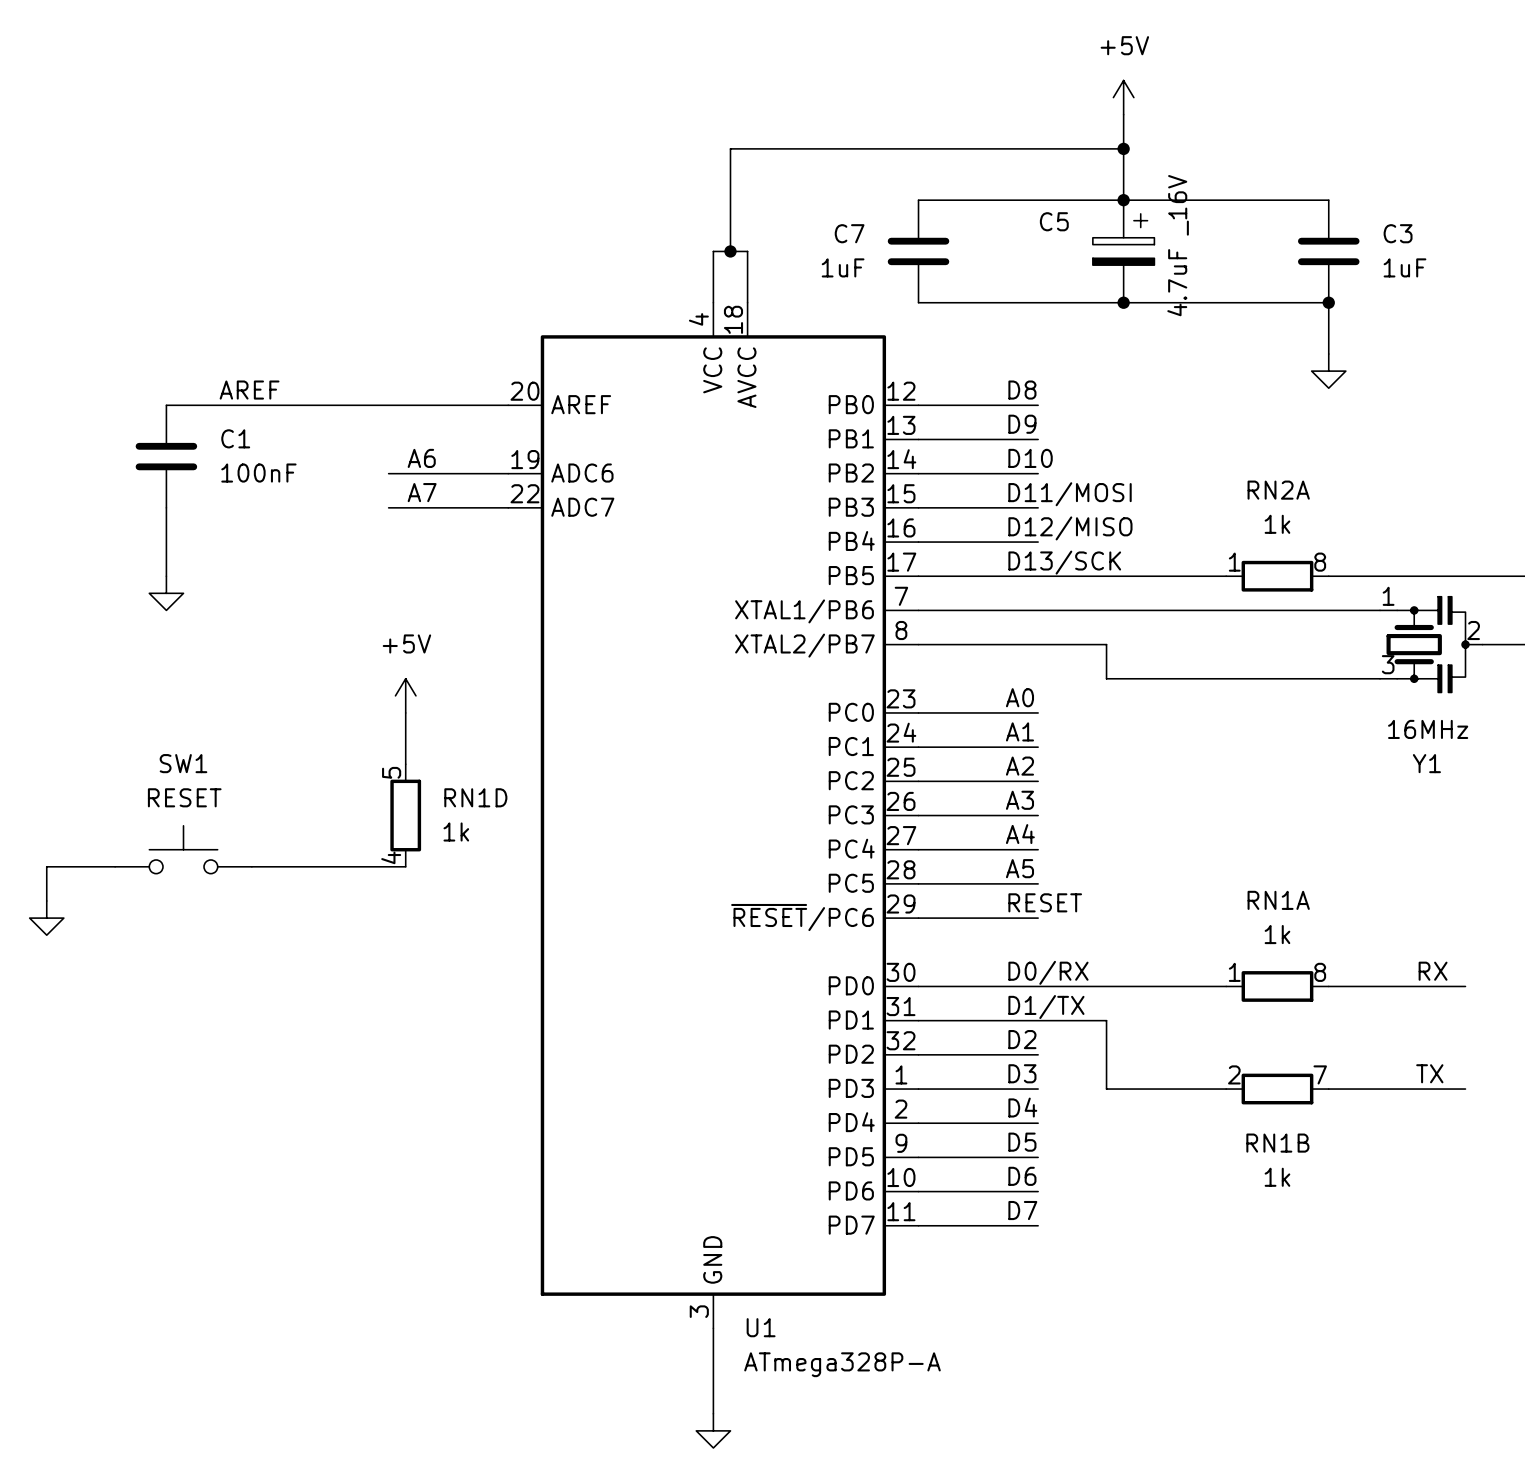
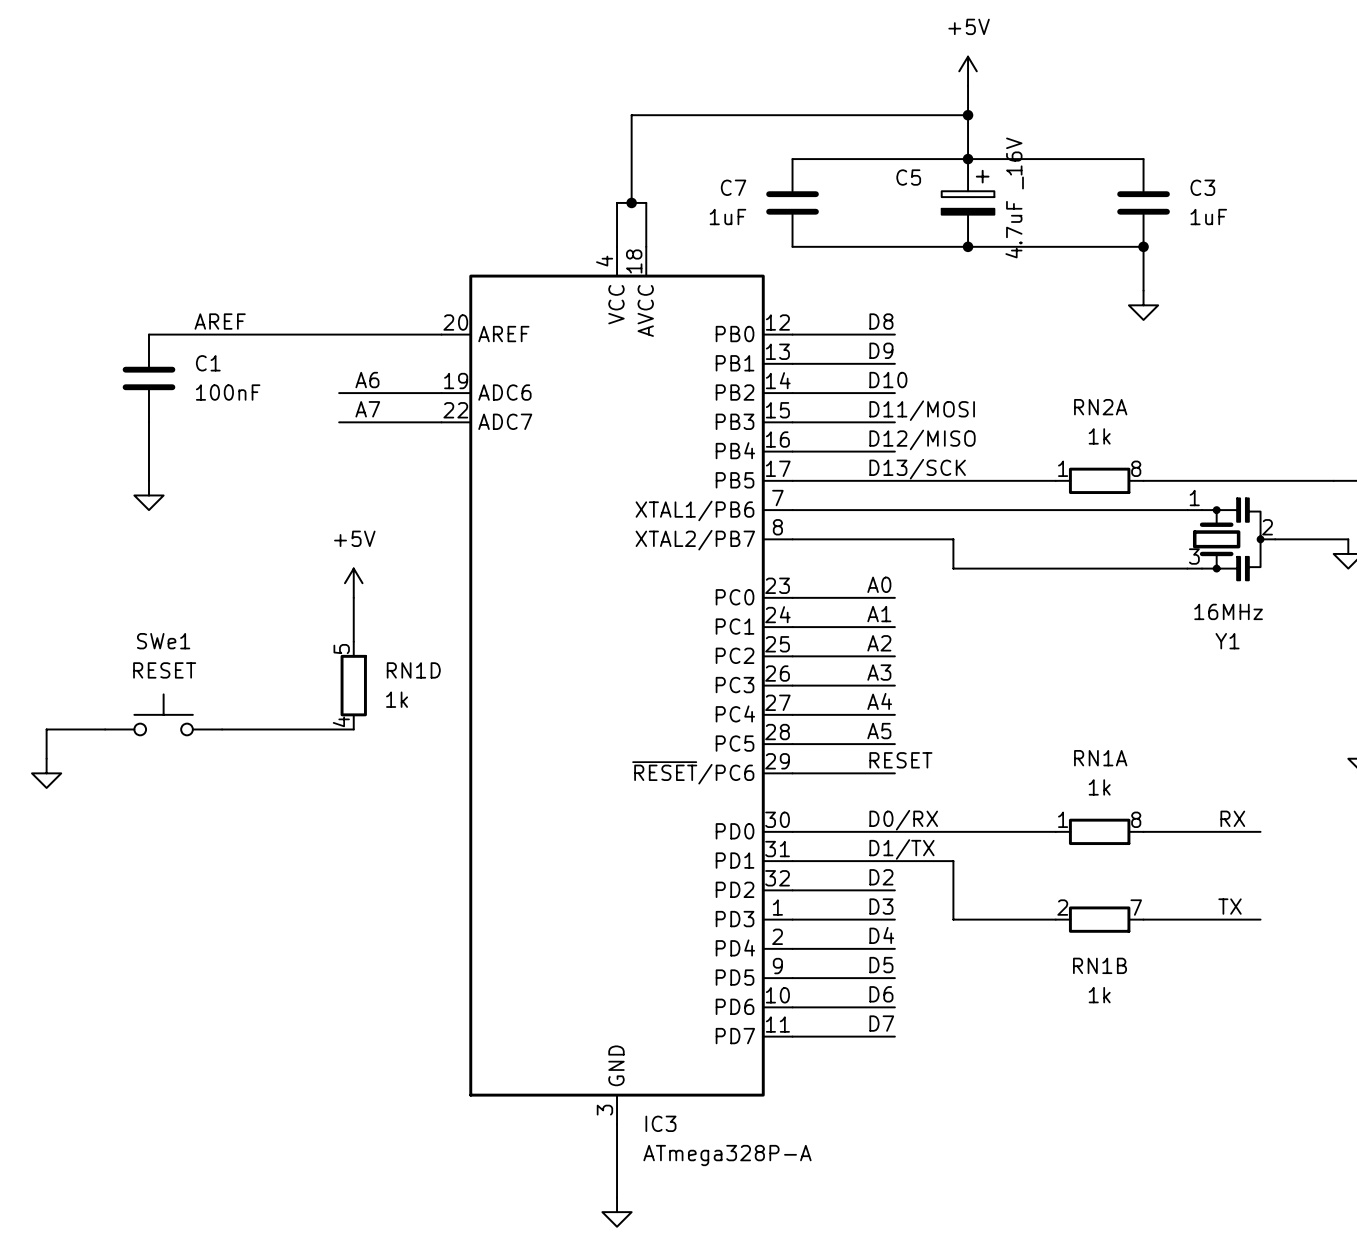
SW1 name: SW1 (183, 763) -> SWe1 (163, 641)
U1 name: U1 (761, 1327) -> IC3 (660, 1123)

